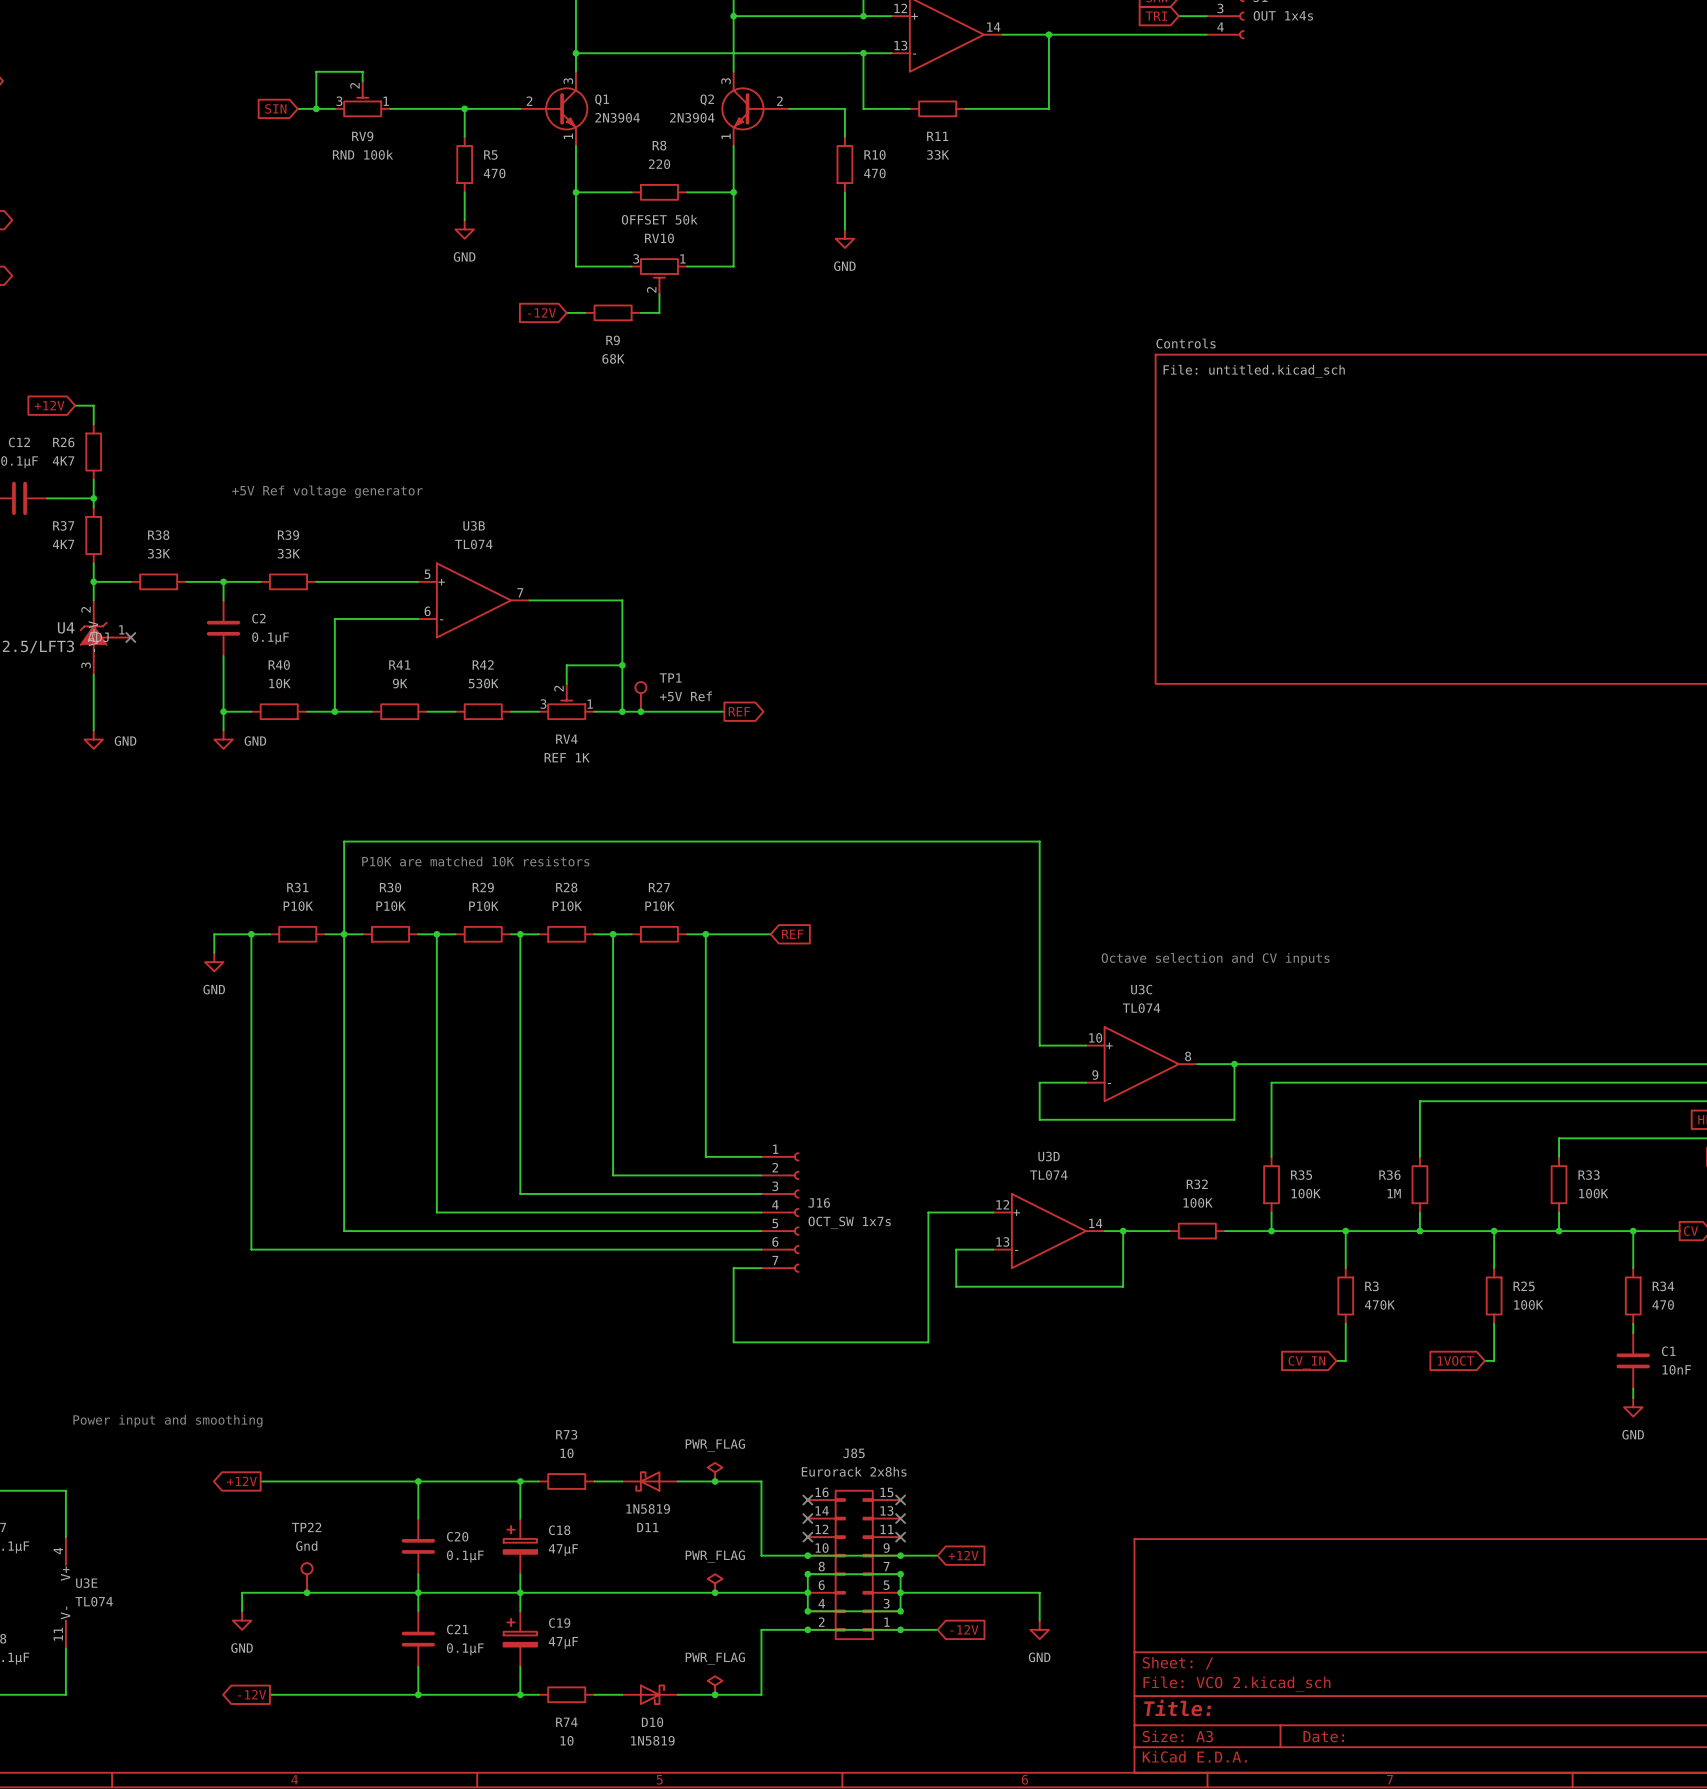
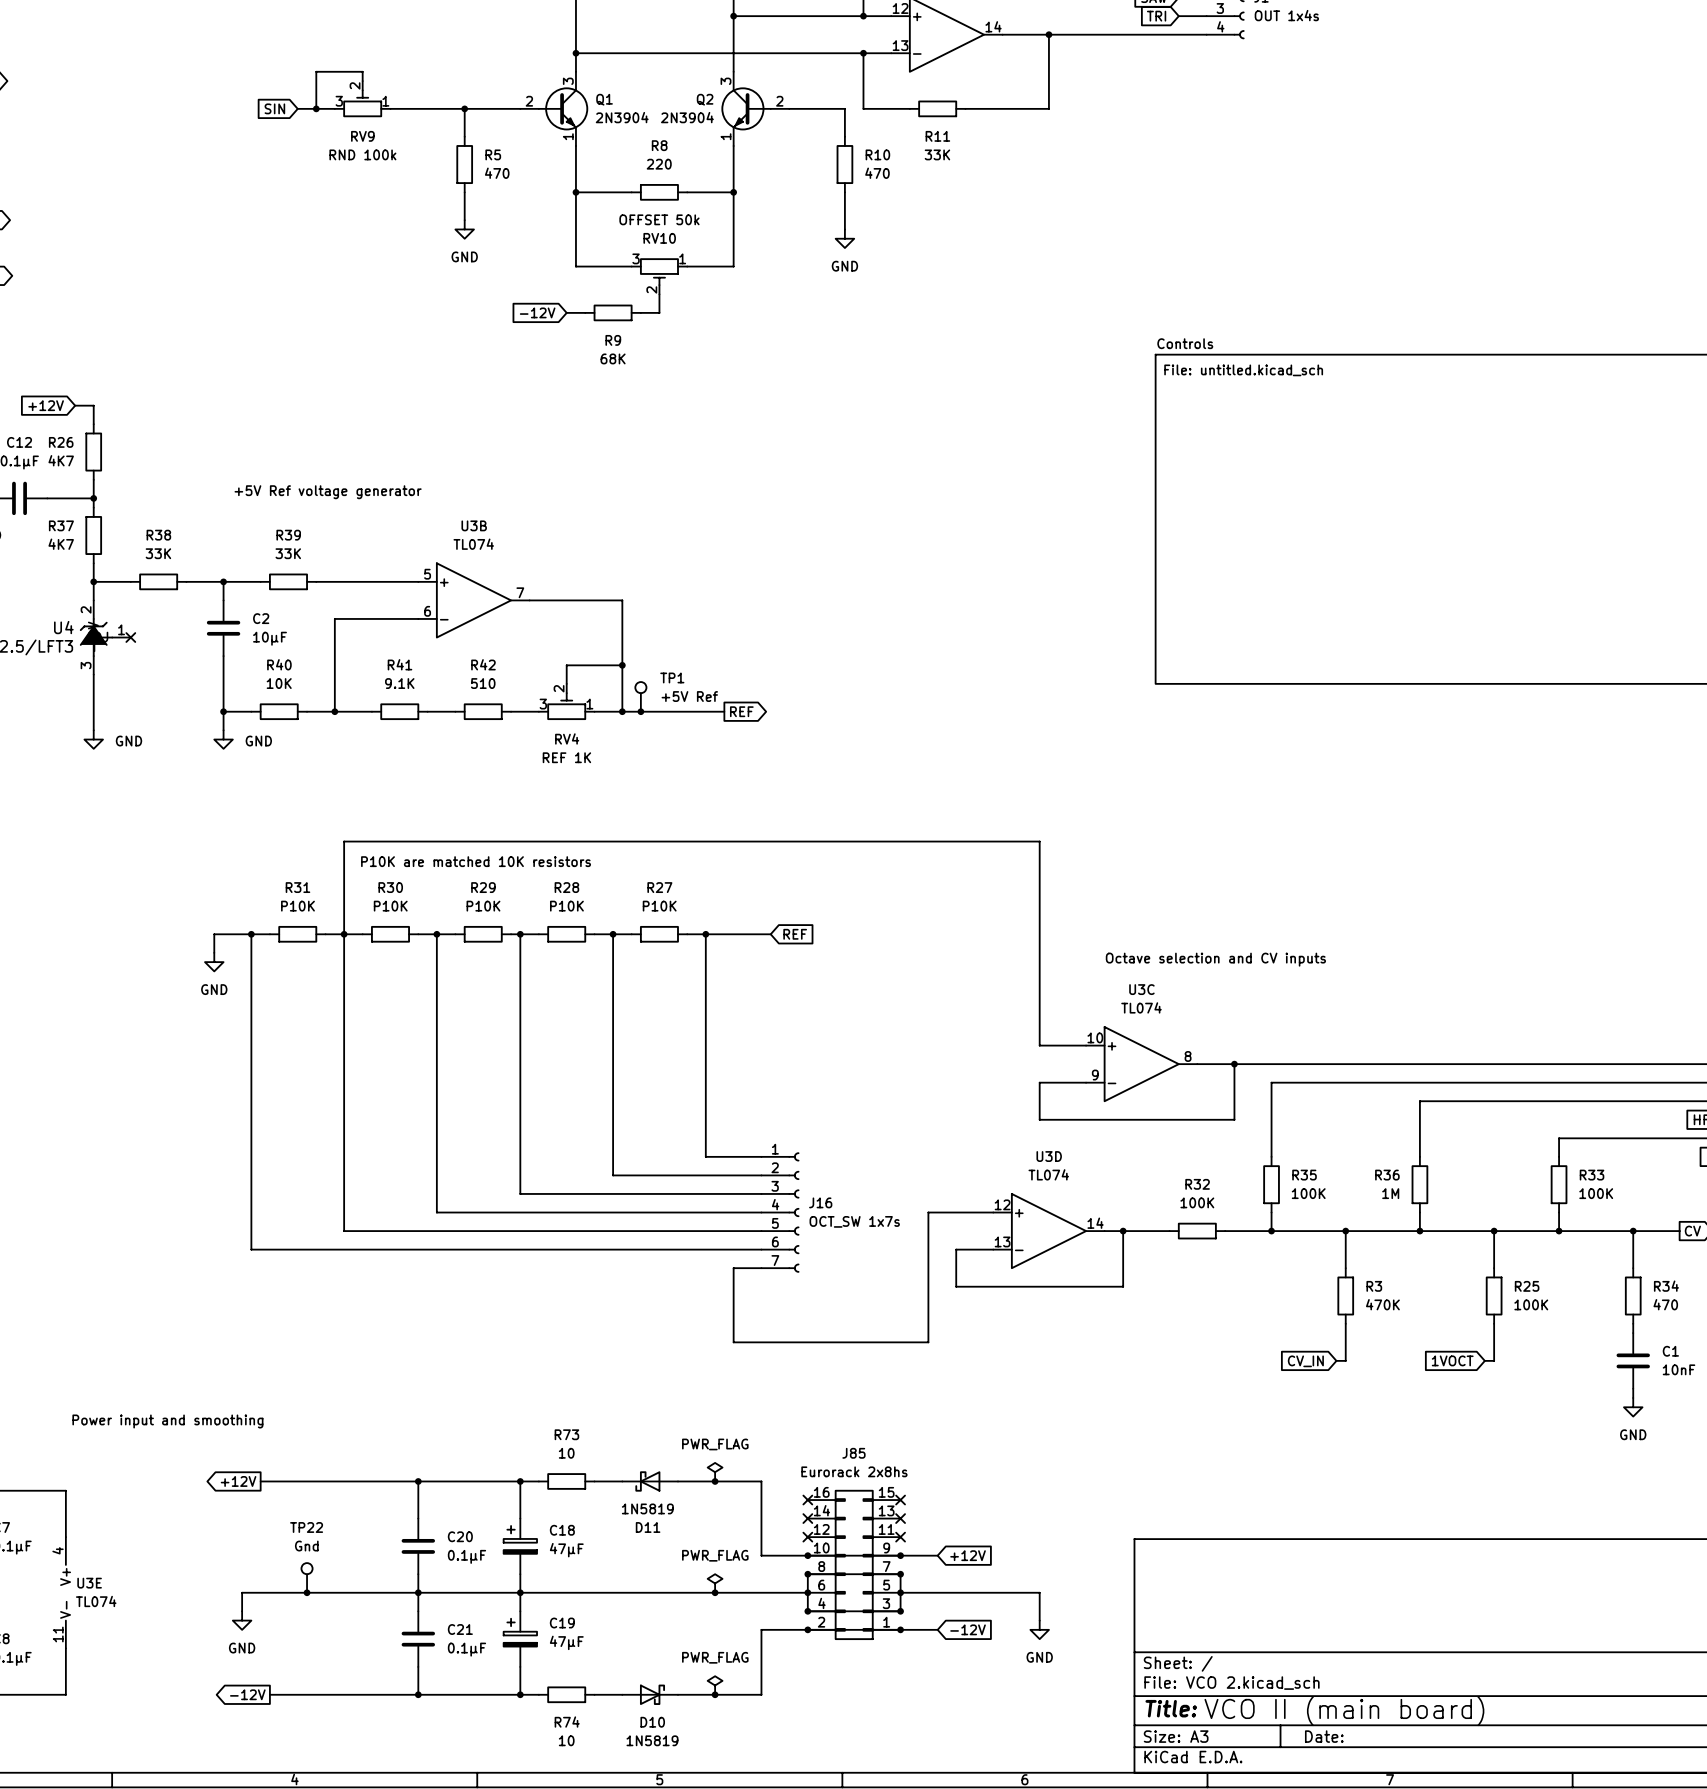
C2 value: 0.1μF (270, 638) -> 10μF (270, 638)
R41 value: 9K (400, 683) -> 9.1K (399, 683)
R42 value: 530K (483, 683) -> 510 (483, 683)
text: none -> VCO II (main board) (1344, 1711)

